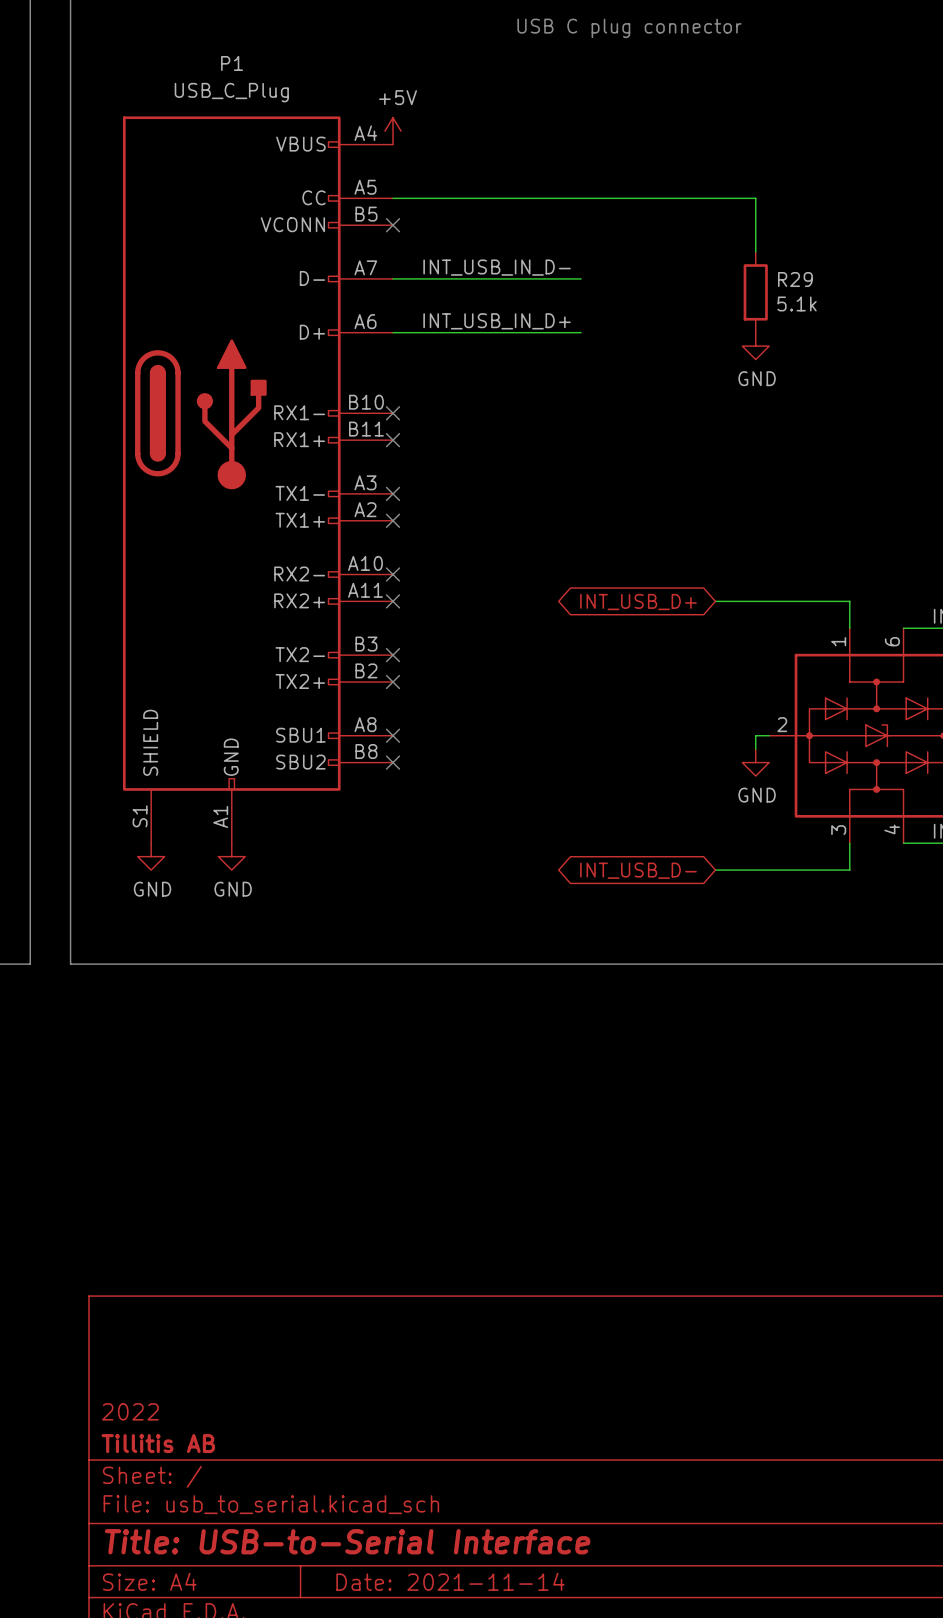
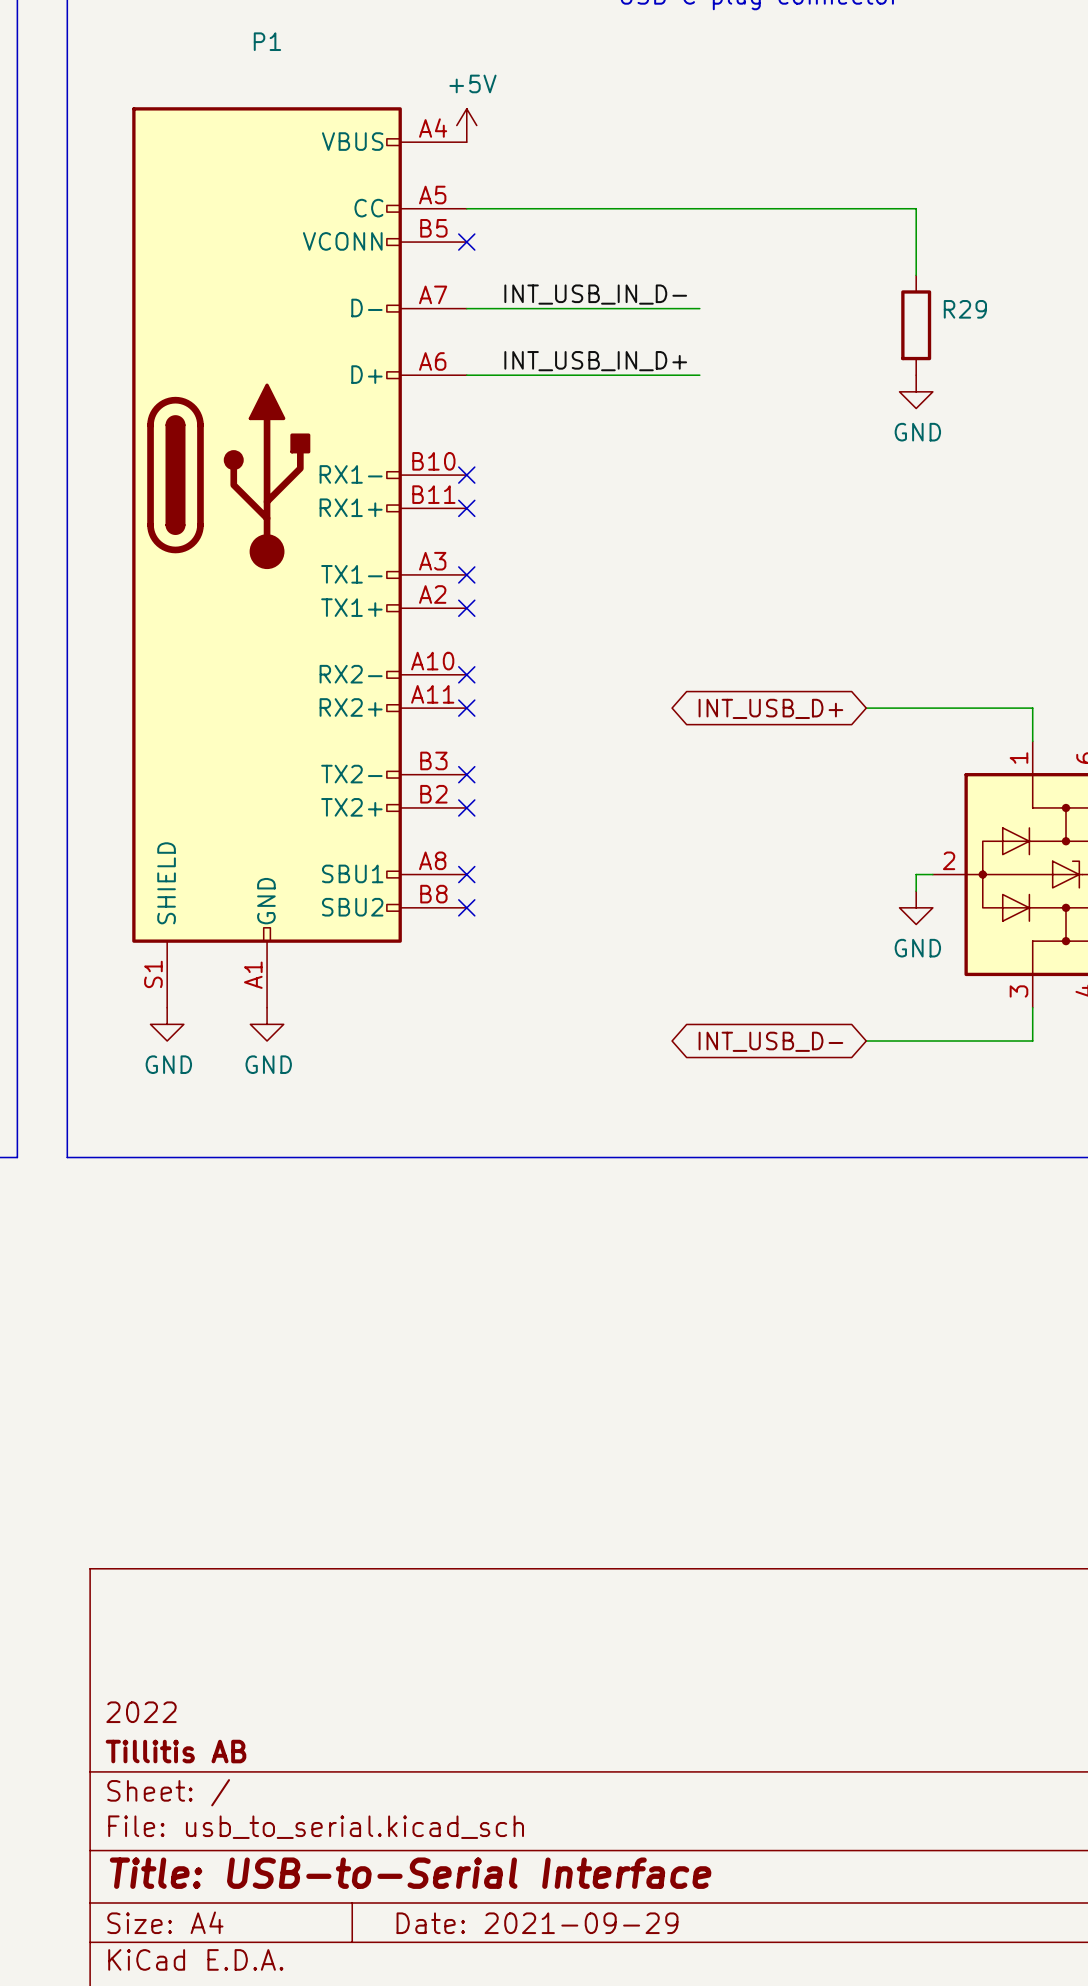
P1 value: USB_C_Plug (231, 92) -> none
R29 value: 5.1k (797, 303) -> none
title block: Date: 2021-11-14 (450, 1581) -> Date: 2021-09-29 (537, 1923)

